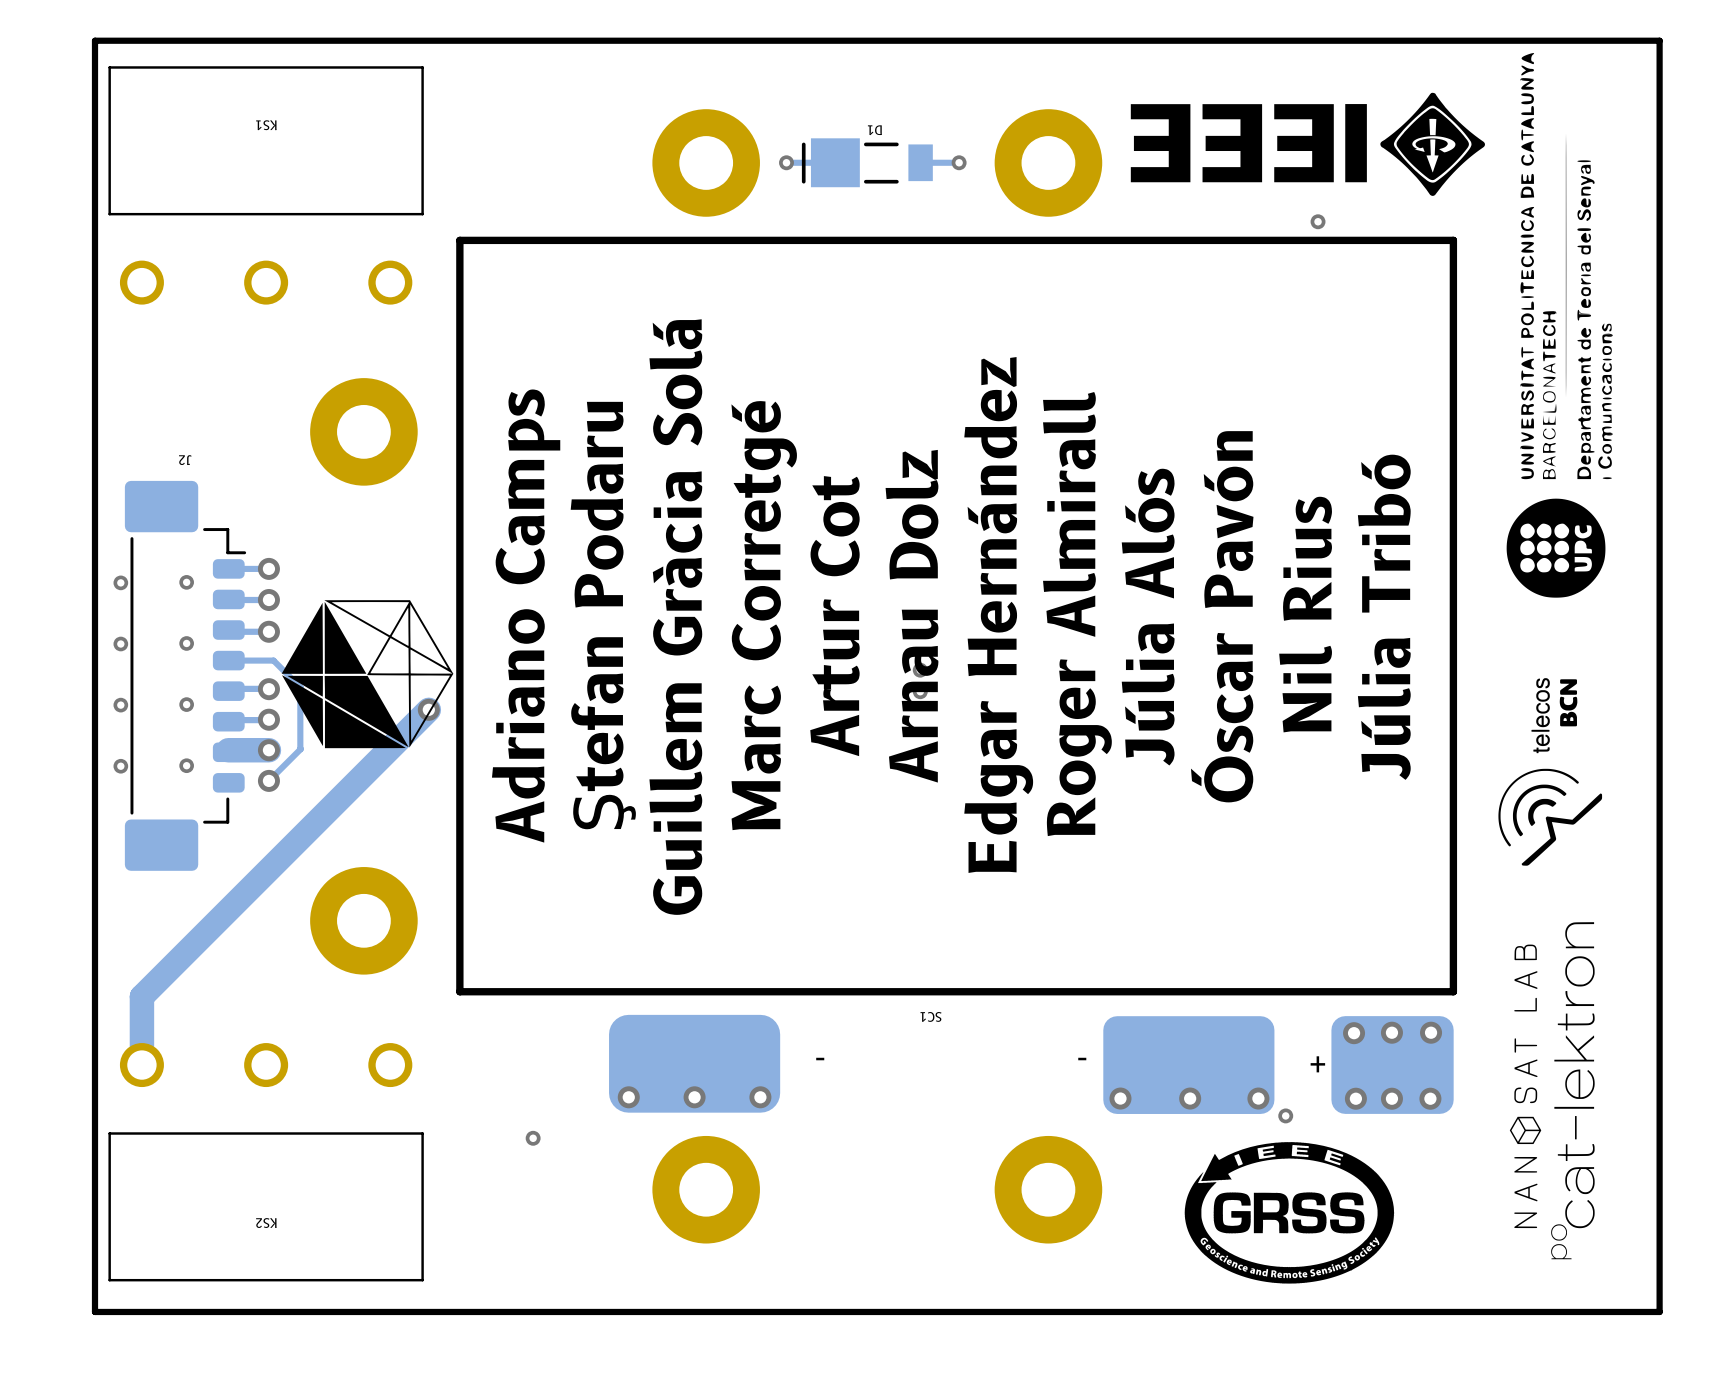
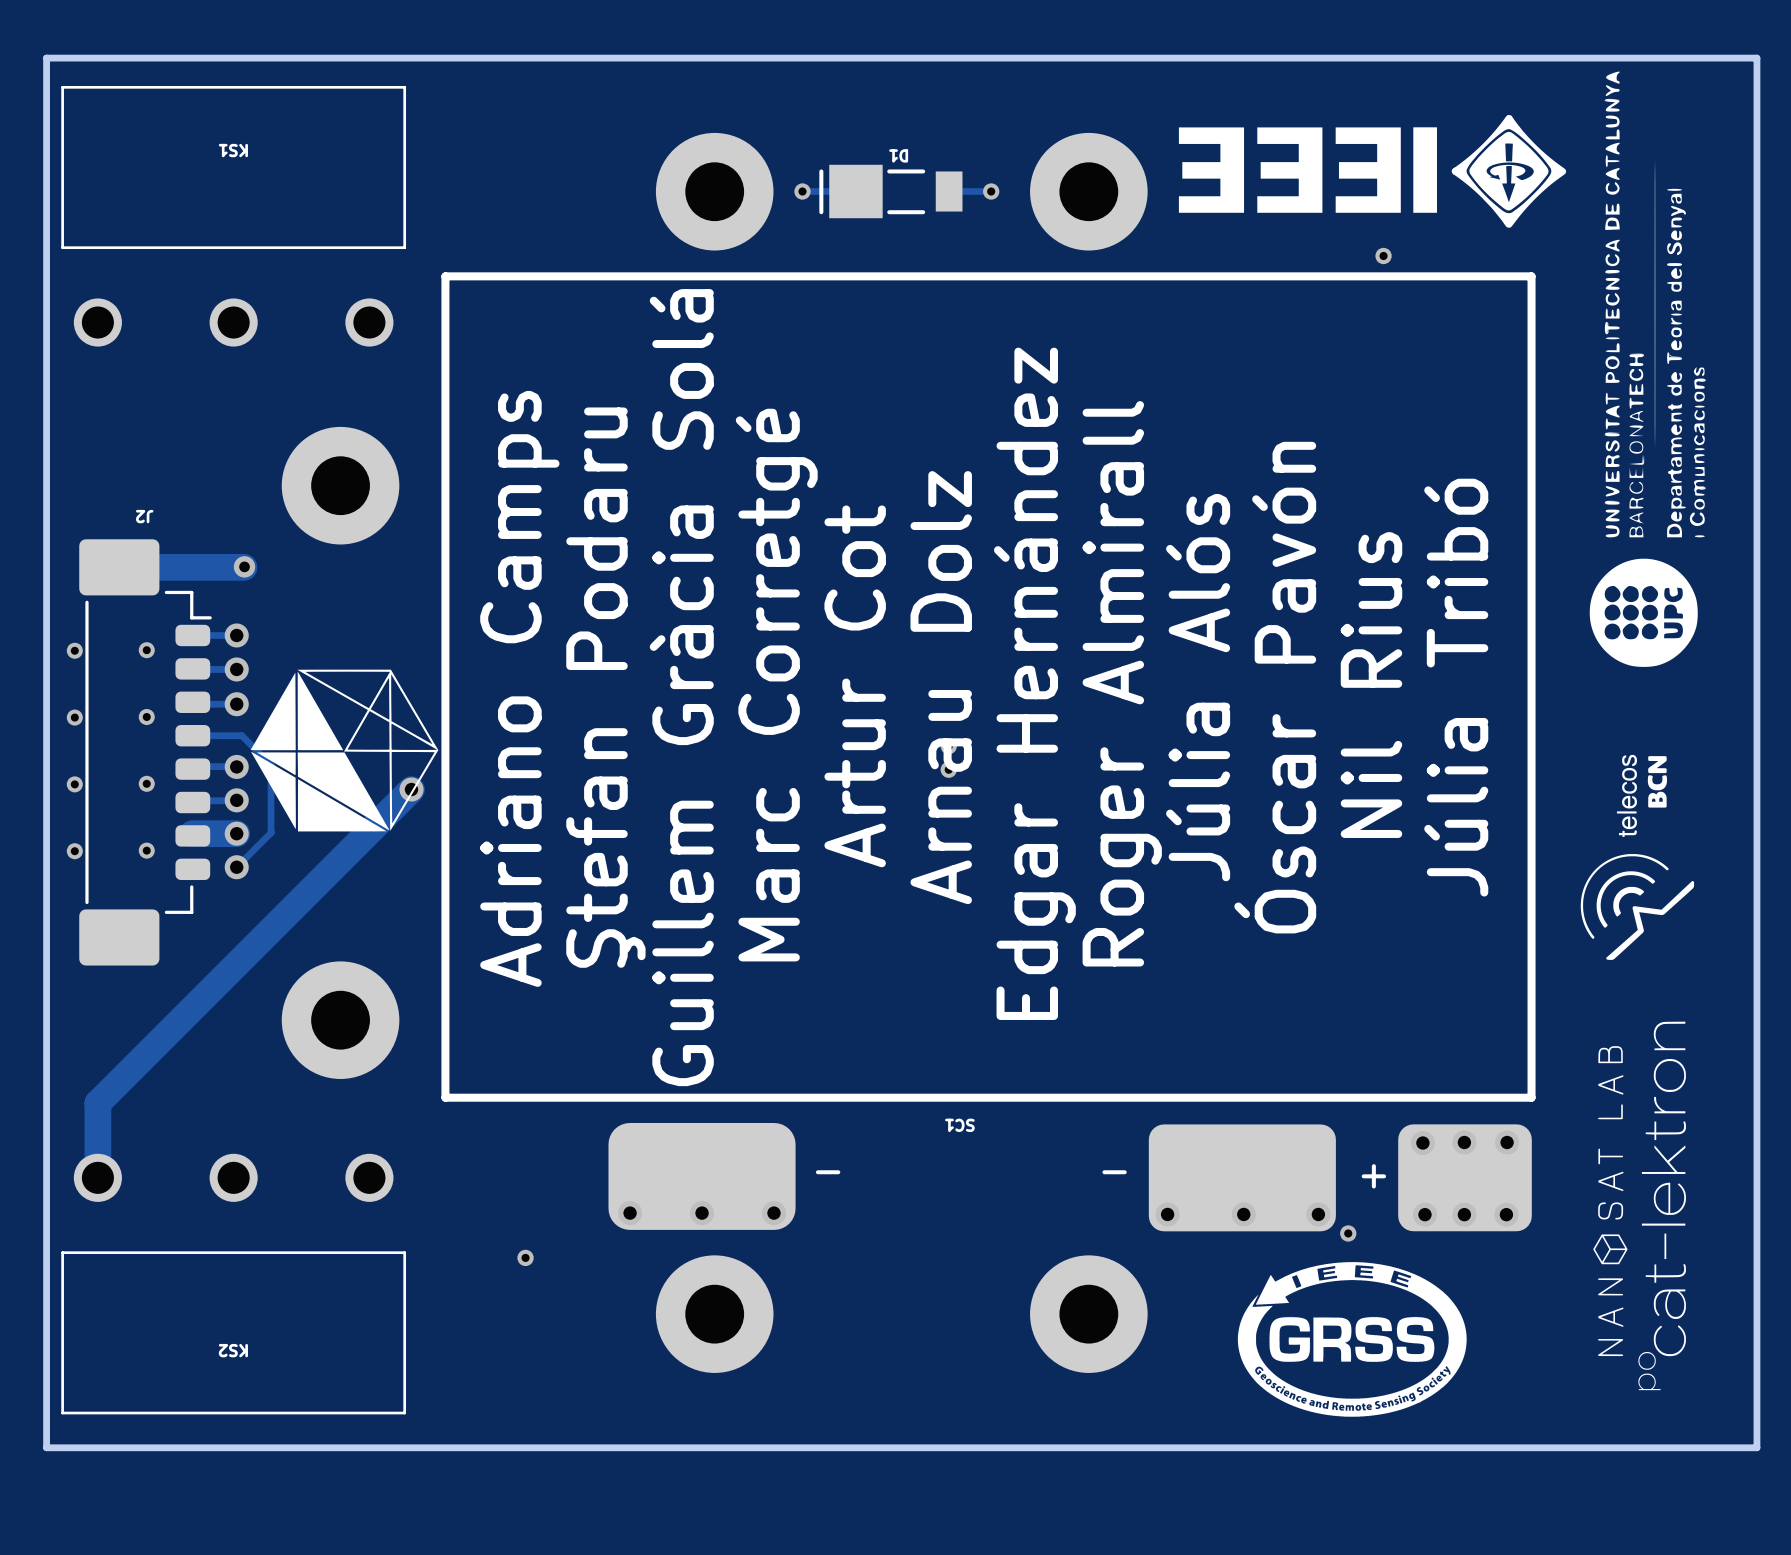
track: none -> (244, 566) (119, 567)
via: none -> (244, 566)

